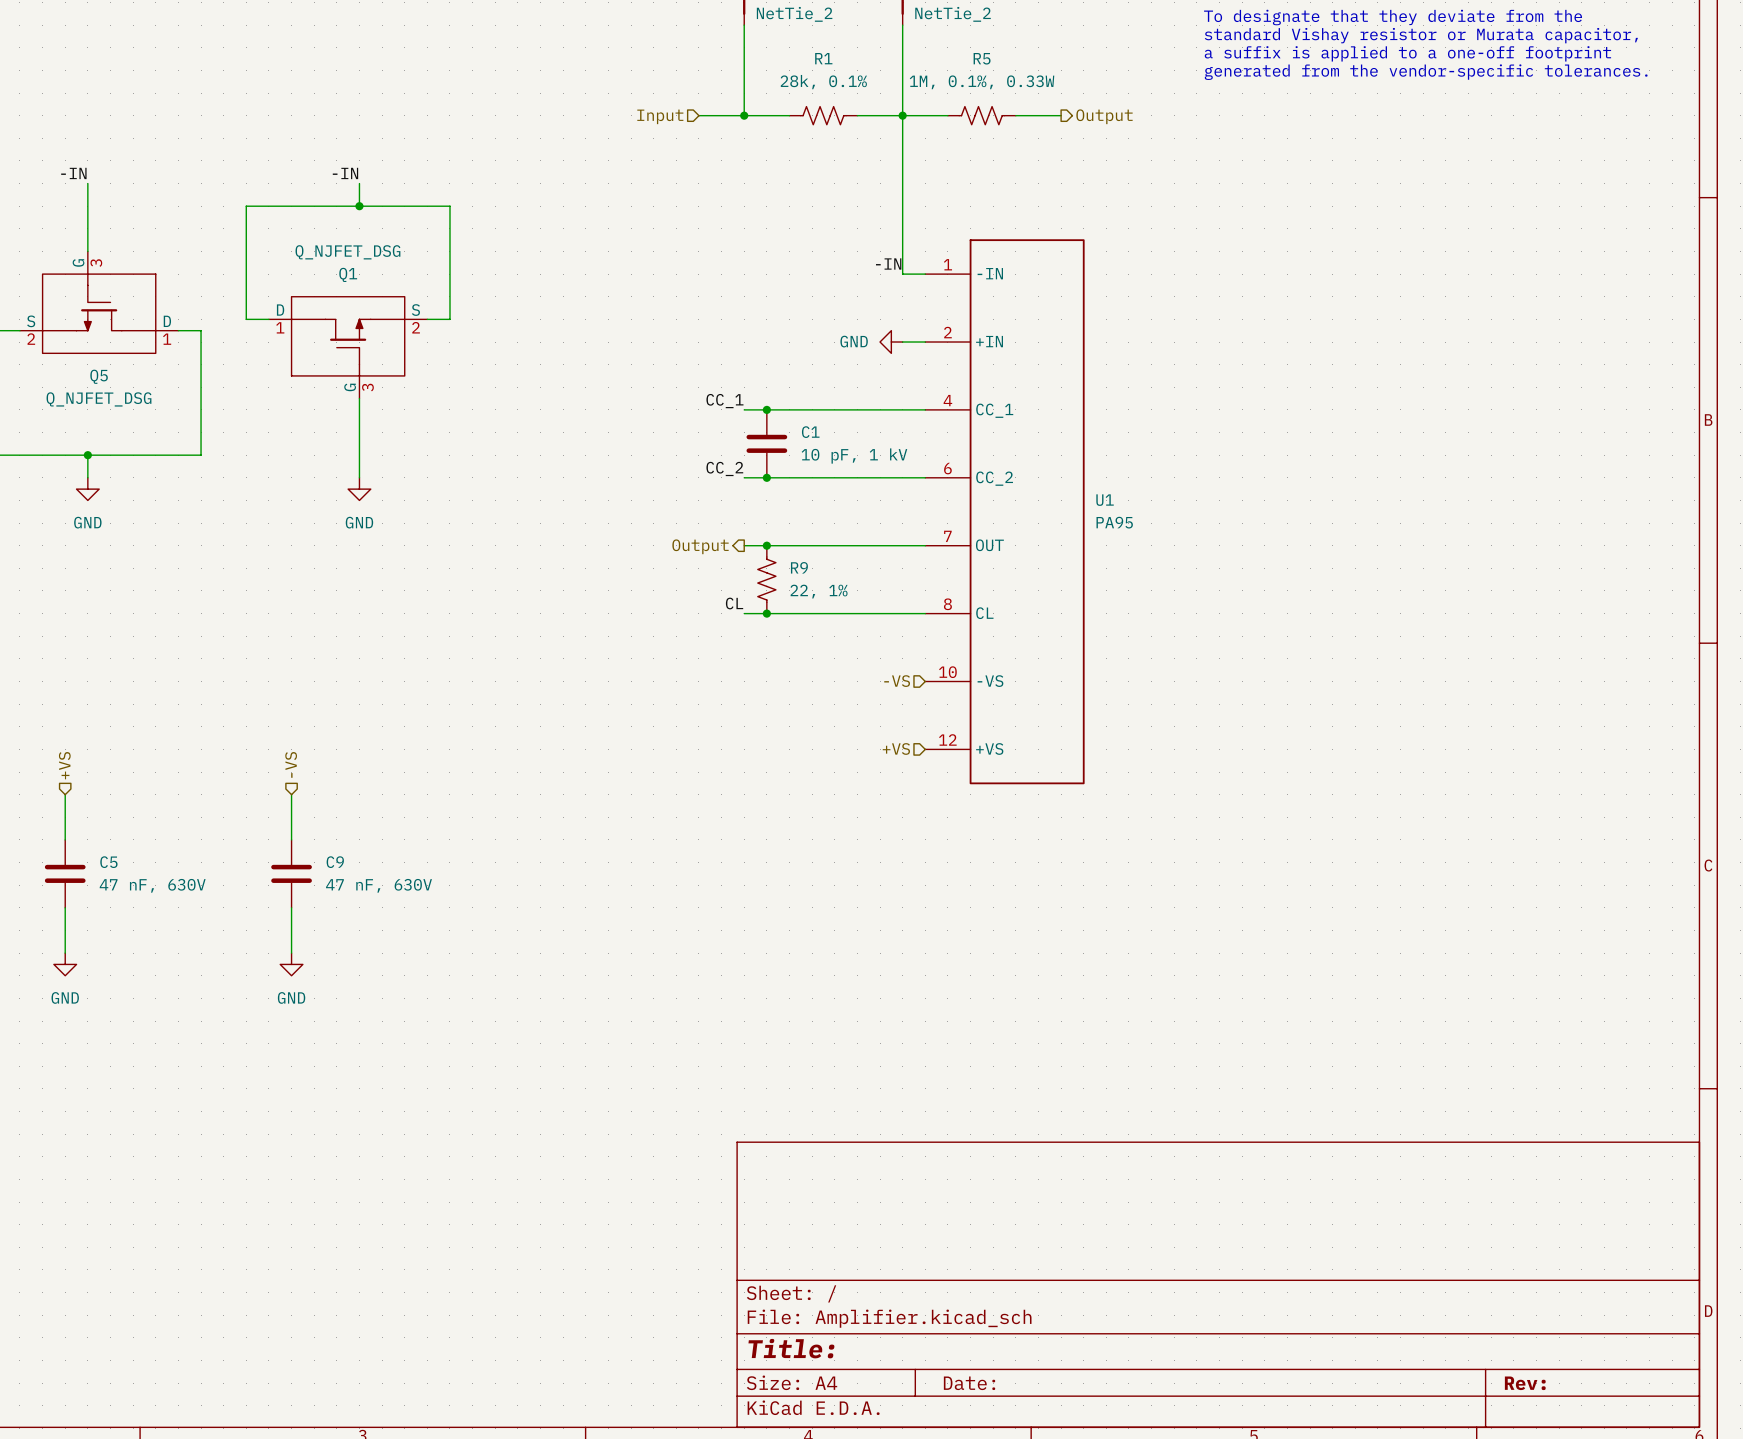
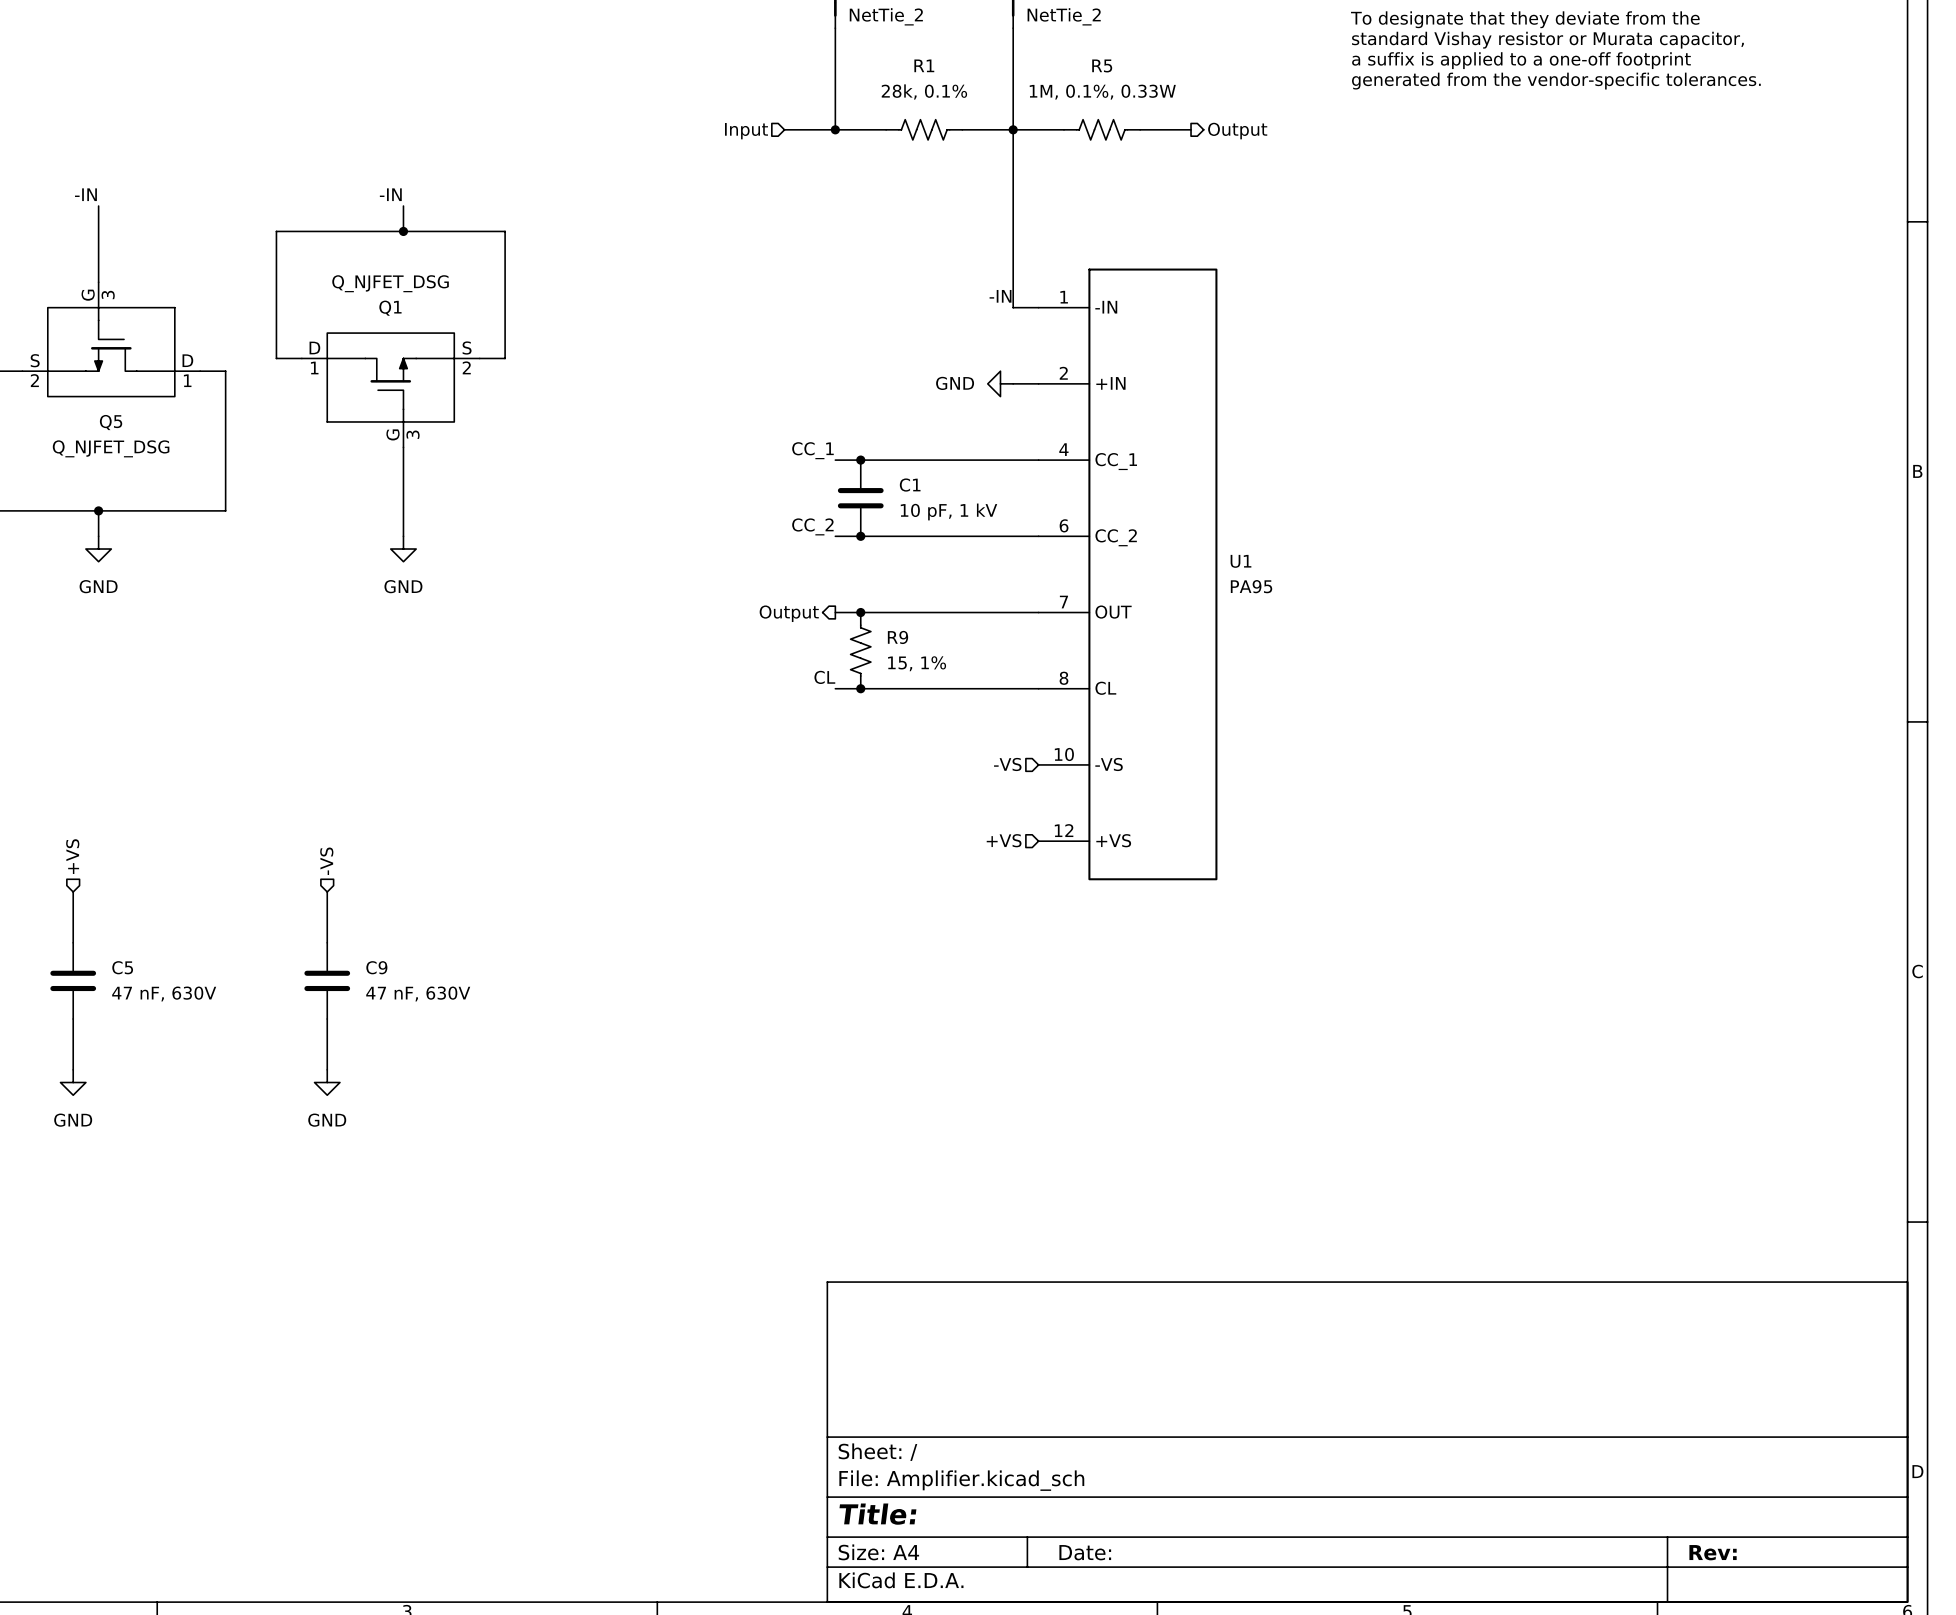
R9 value: 22, 1% (819, 591) -> 15, 1% (917, 663)

